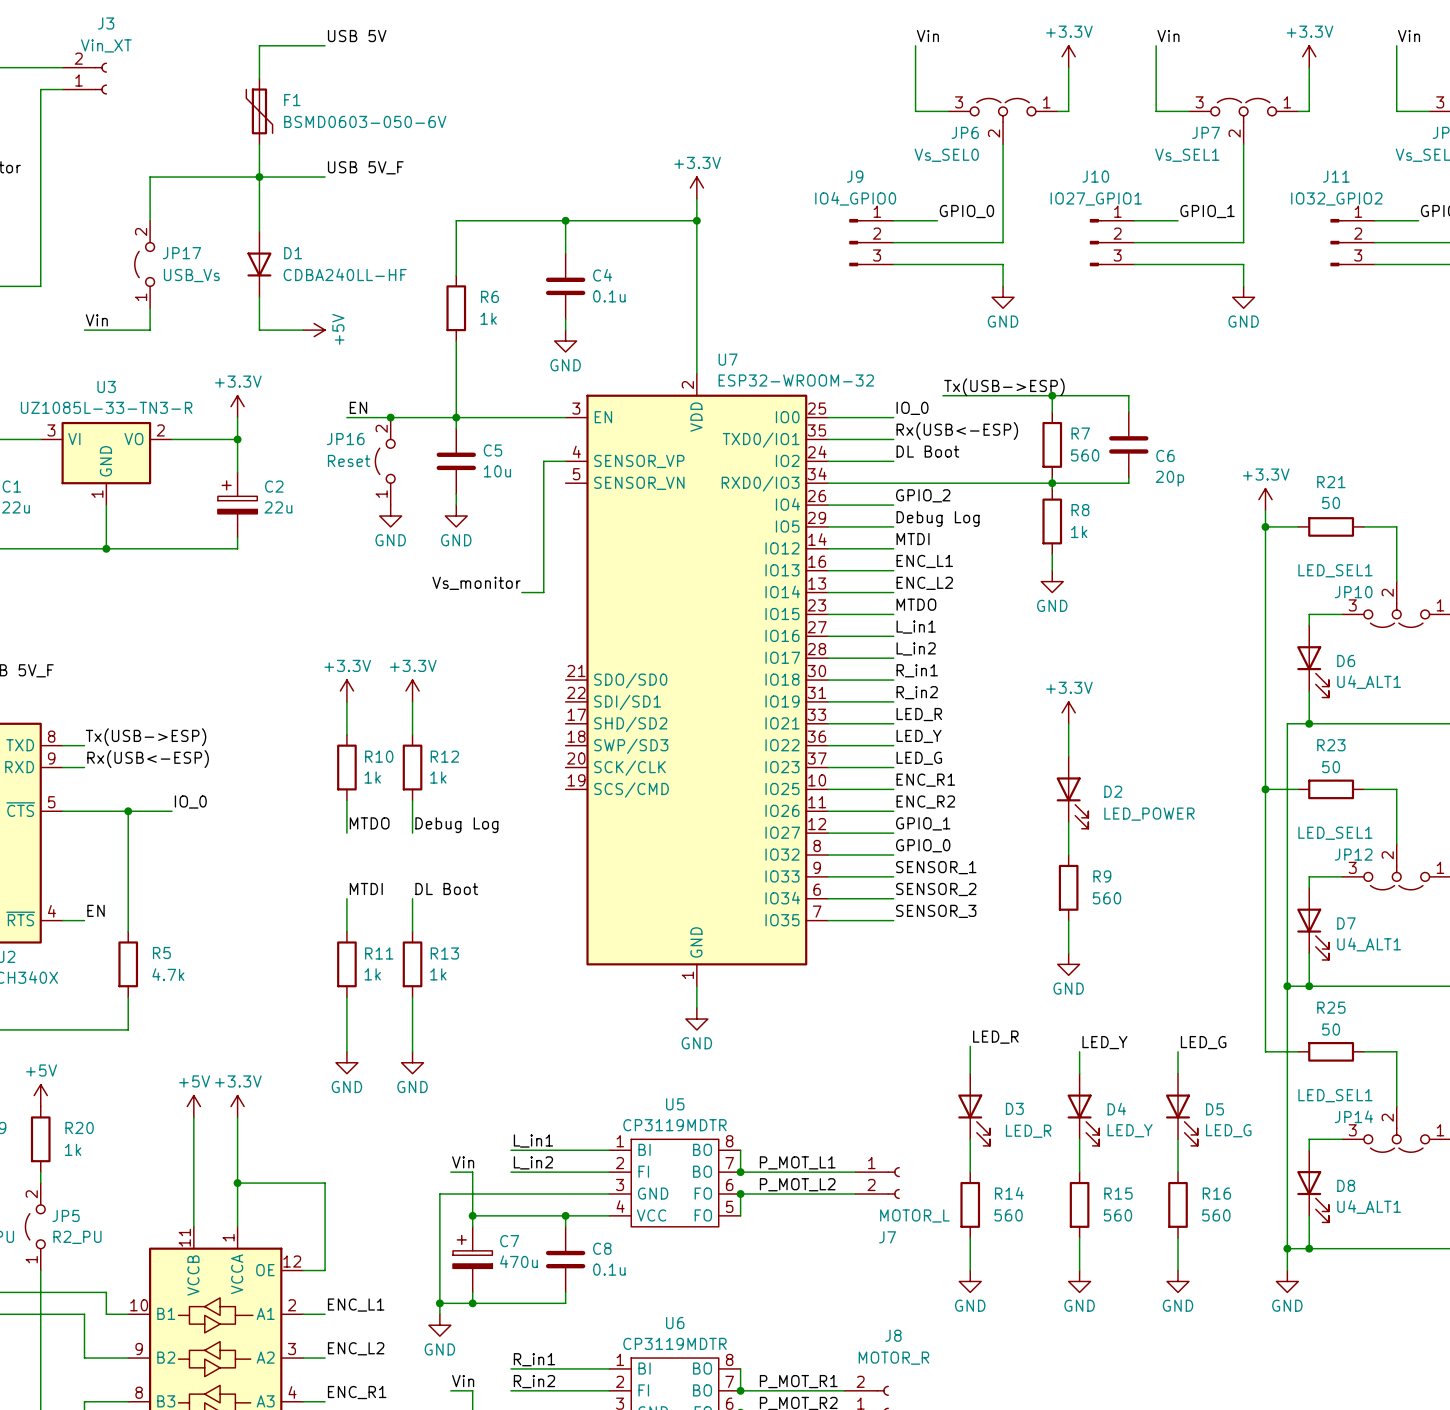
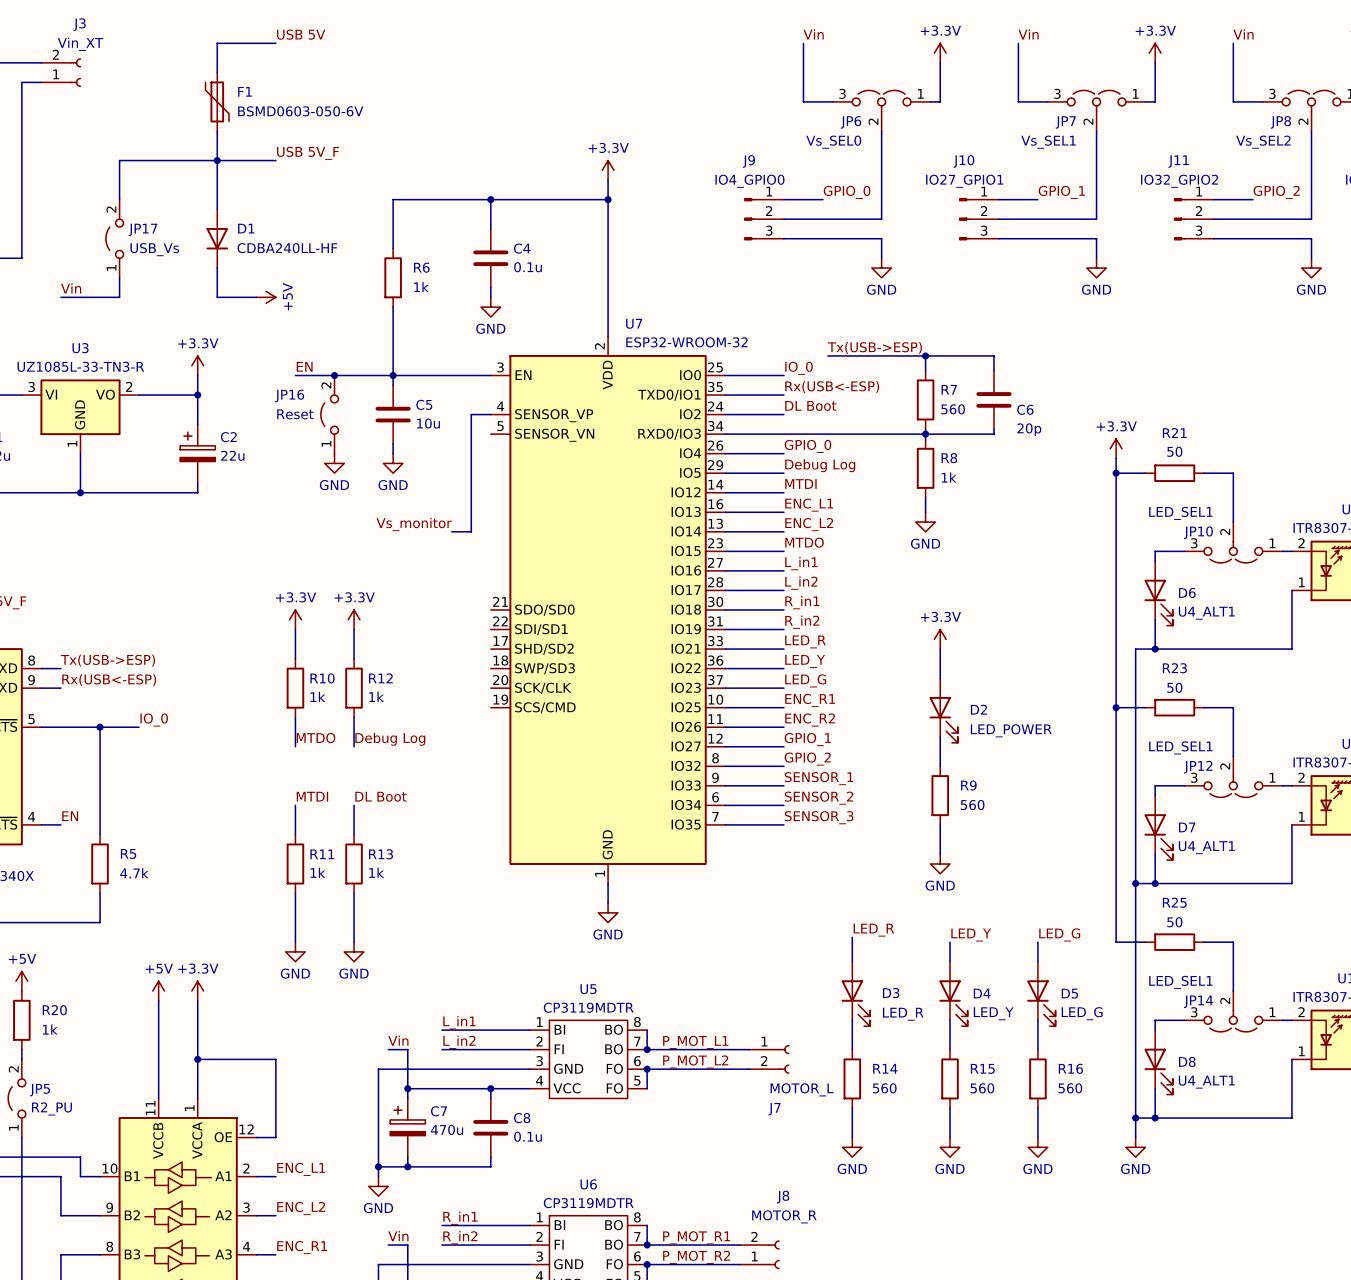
label: GPIO_2 (923, 495) -> GPIO_0 (807, 446)
label: GPIO_0 (923, 845) -> GPIO_2 (807, 759)

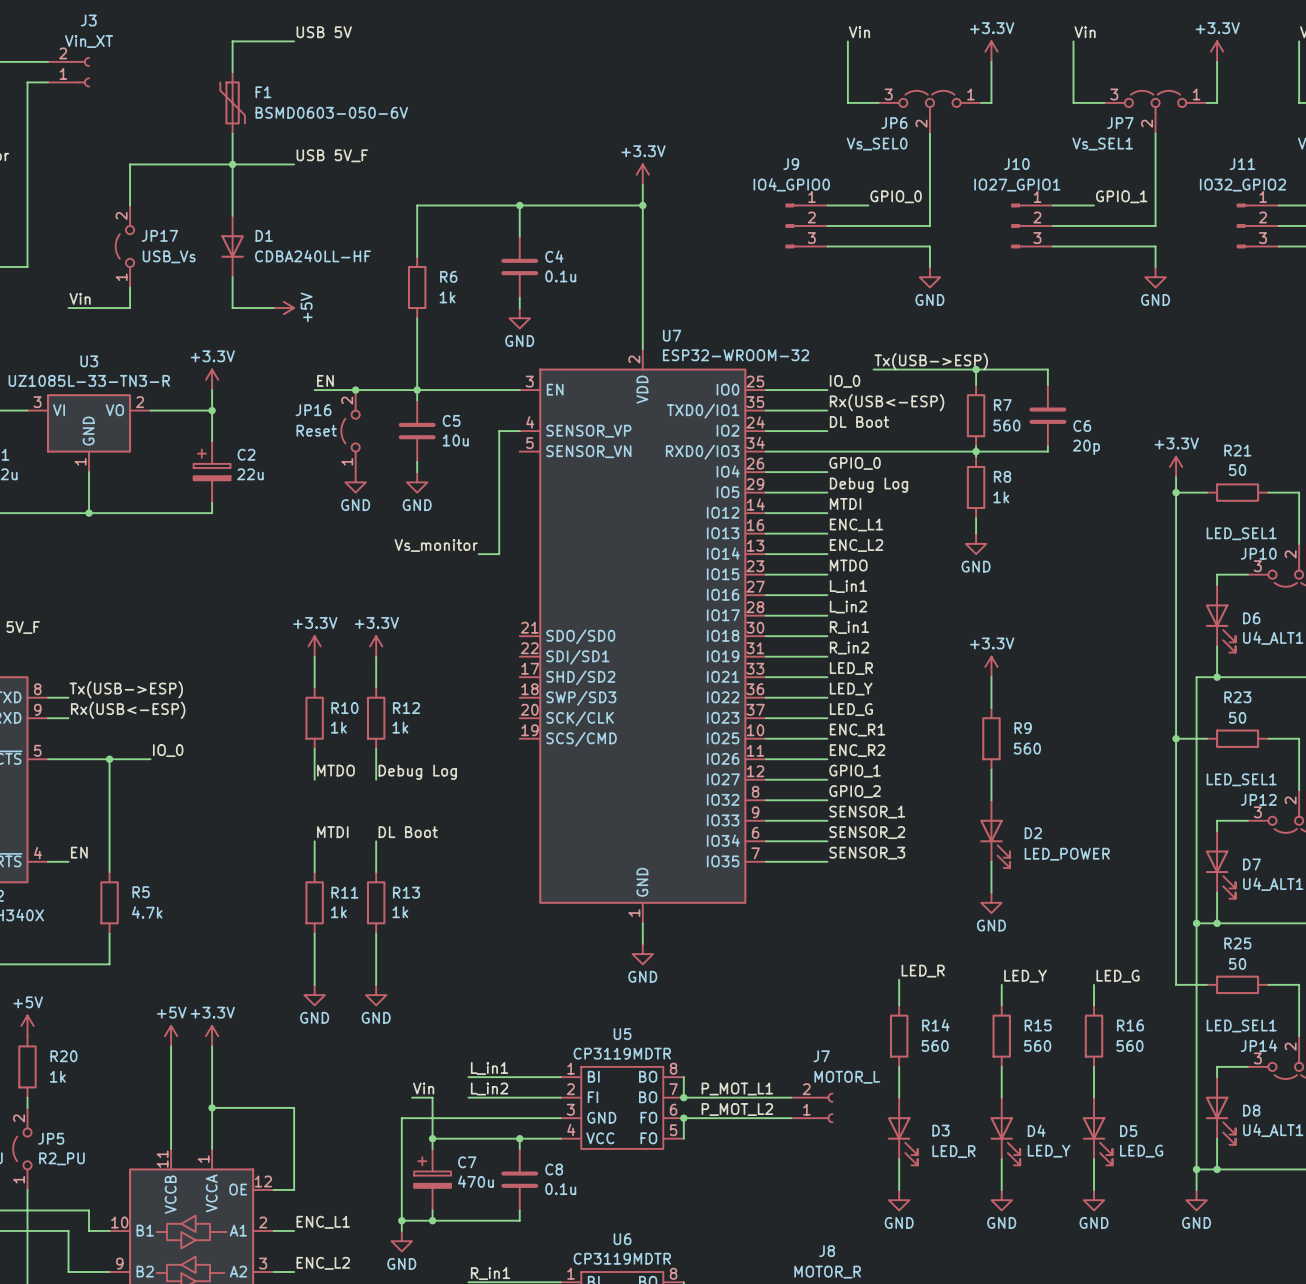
D2 position: (943, 710) -> (995, 834)
R9 position: (940, 795) -> (991, 738)
D3 position: (855, 993) -> (902, 1131)
D4 position: (953, 993) -> (1005, 1131)
D5 position: (1041, 993) -> (1097, 1131)
J7 flip: as is (783, 1059) -> up-down (827, 1107)
R14 position: (852, 1078) -> (899, 1036)
R15 position: (950, 1078) -> (1001, 1036)
R16 position: (1037, 1078) -> (1094, 1036)

